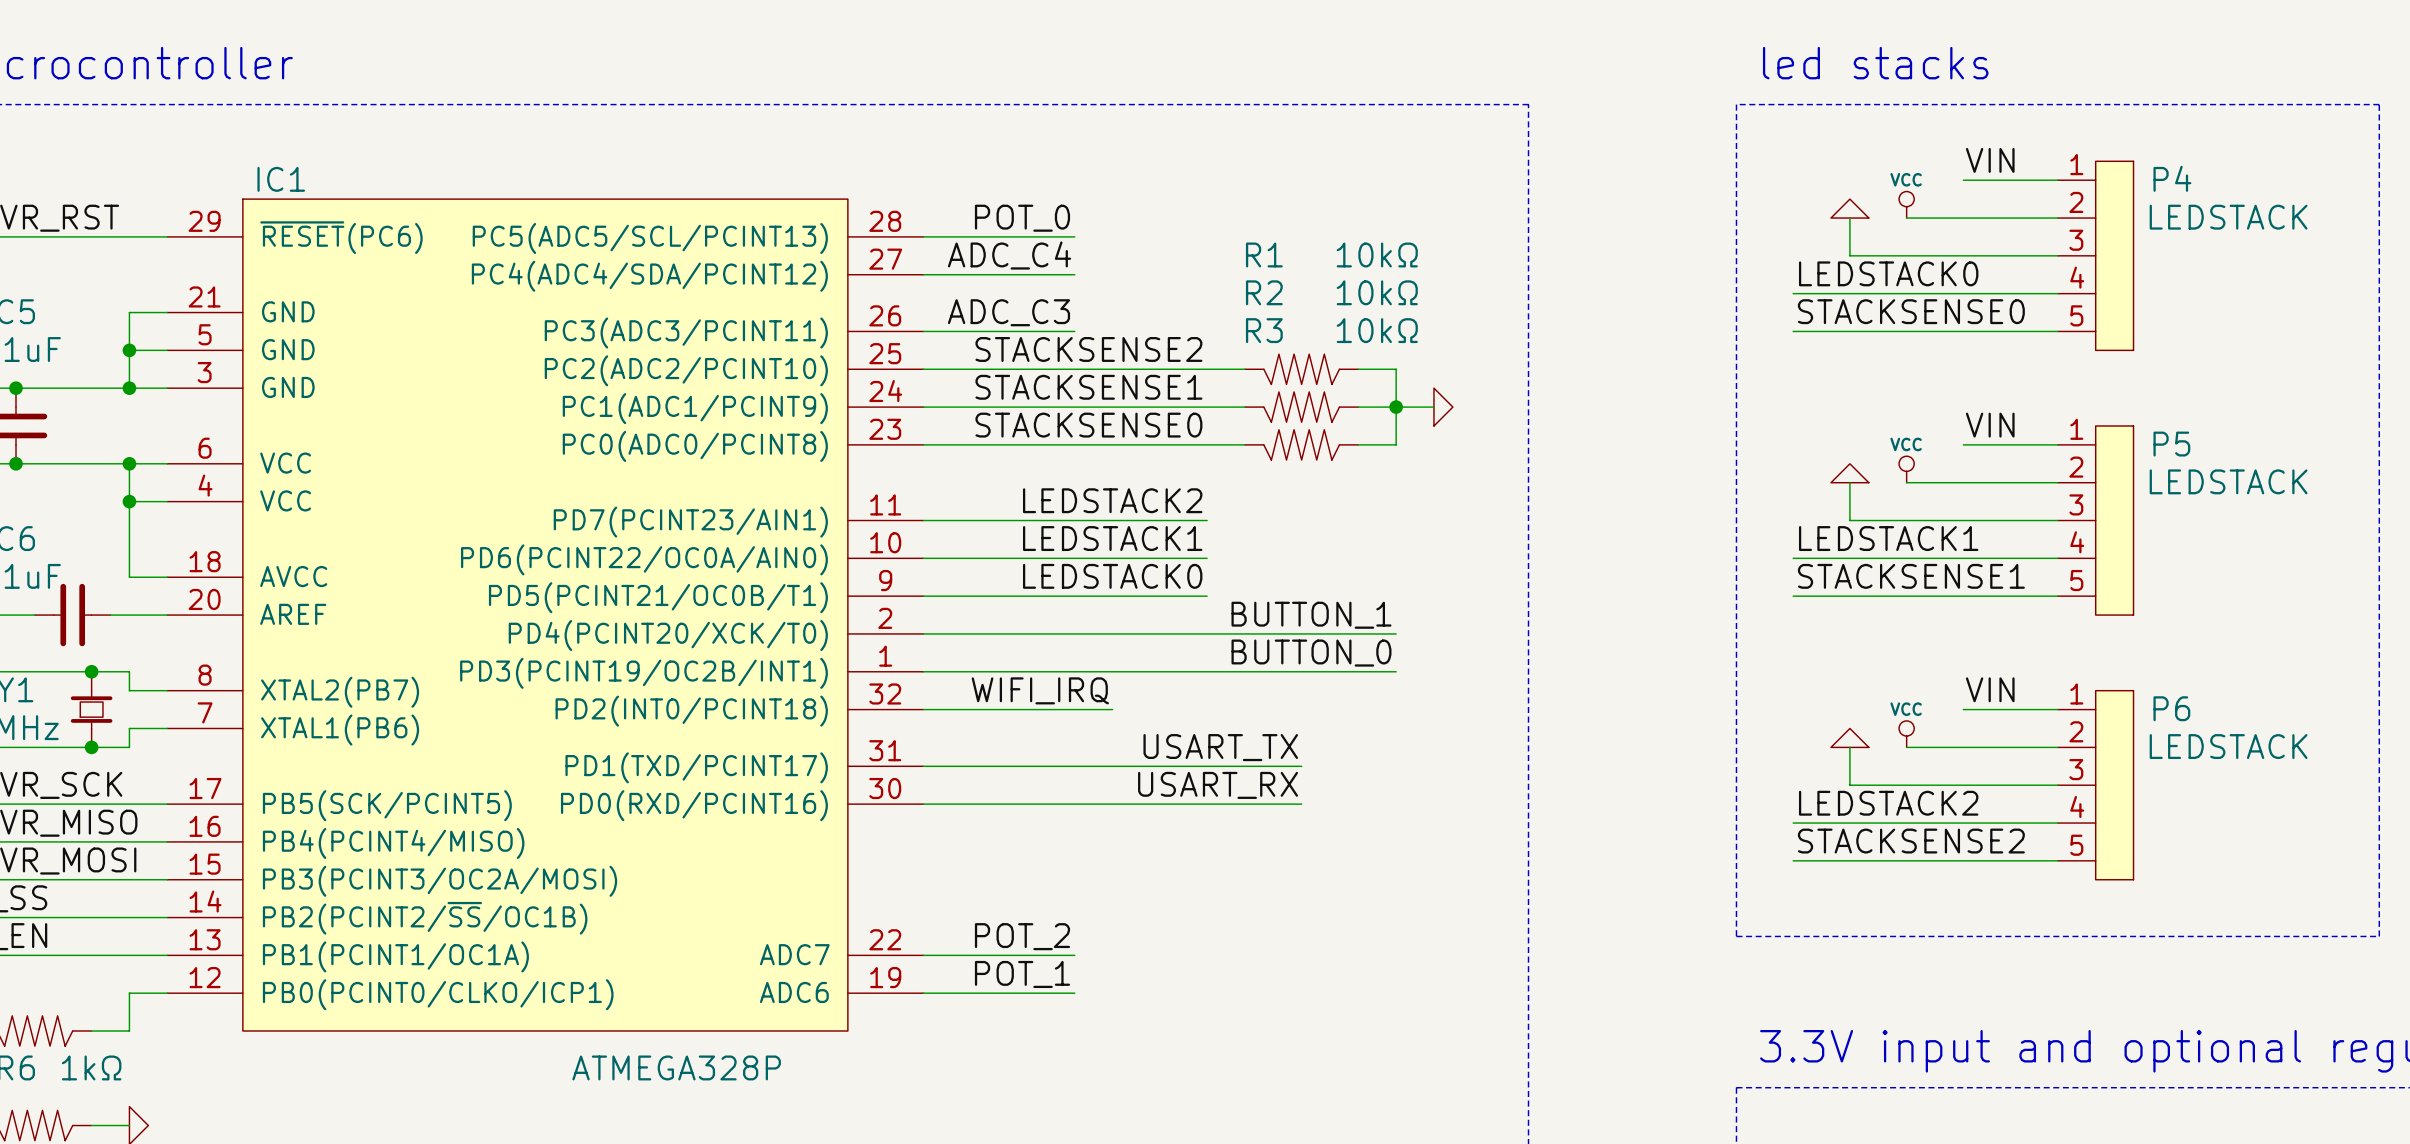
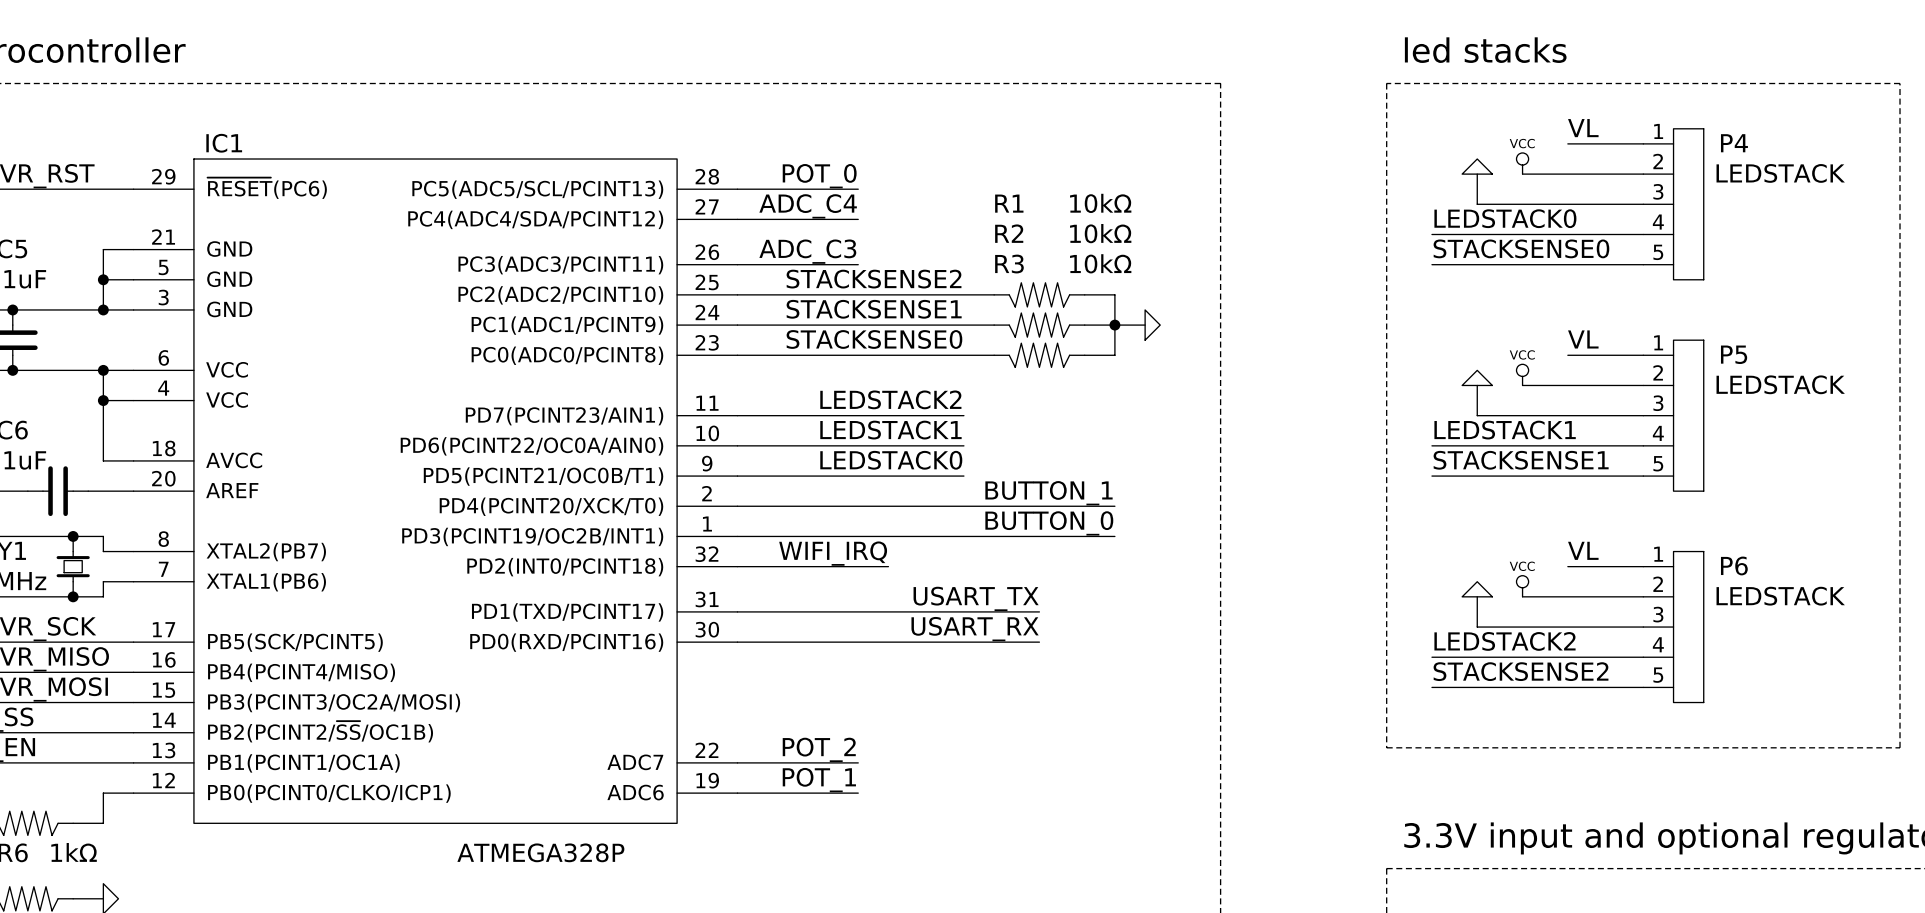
label: VIN (1990, 160) -> VL (1583, 128)
label: VIN (1990, 425) -> VL (1583, 339)
label: VIN (1990, 689) -> VL (1583, 550)

